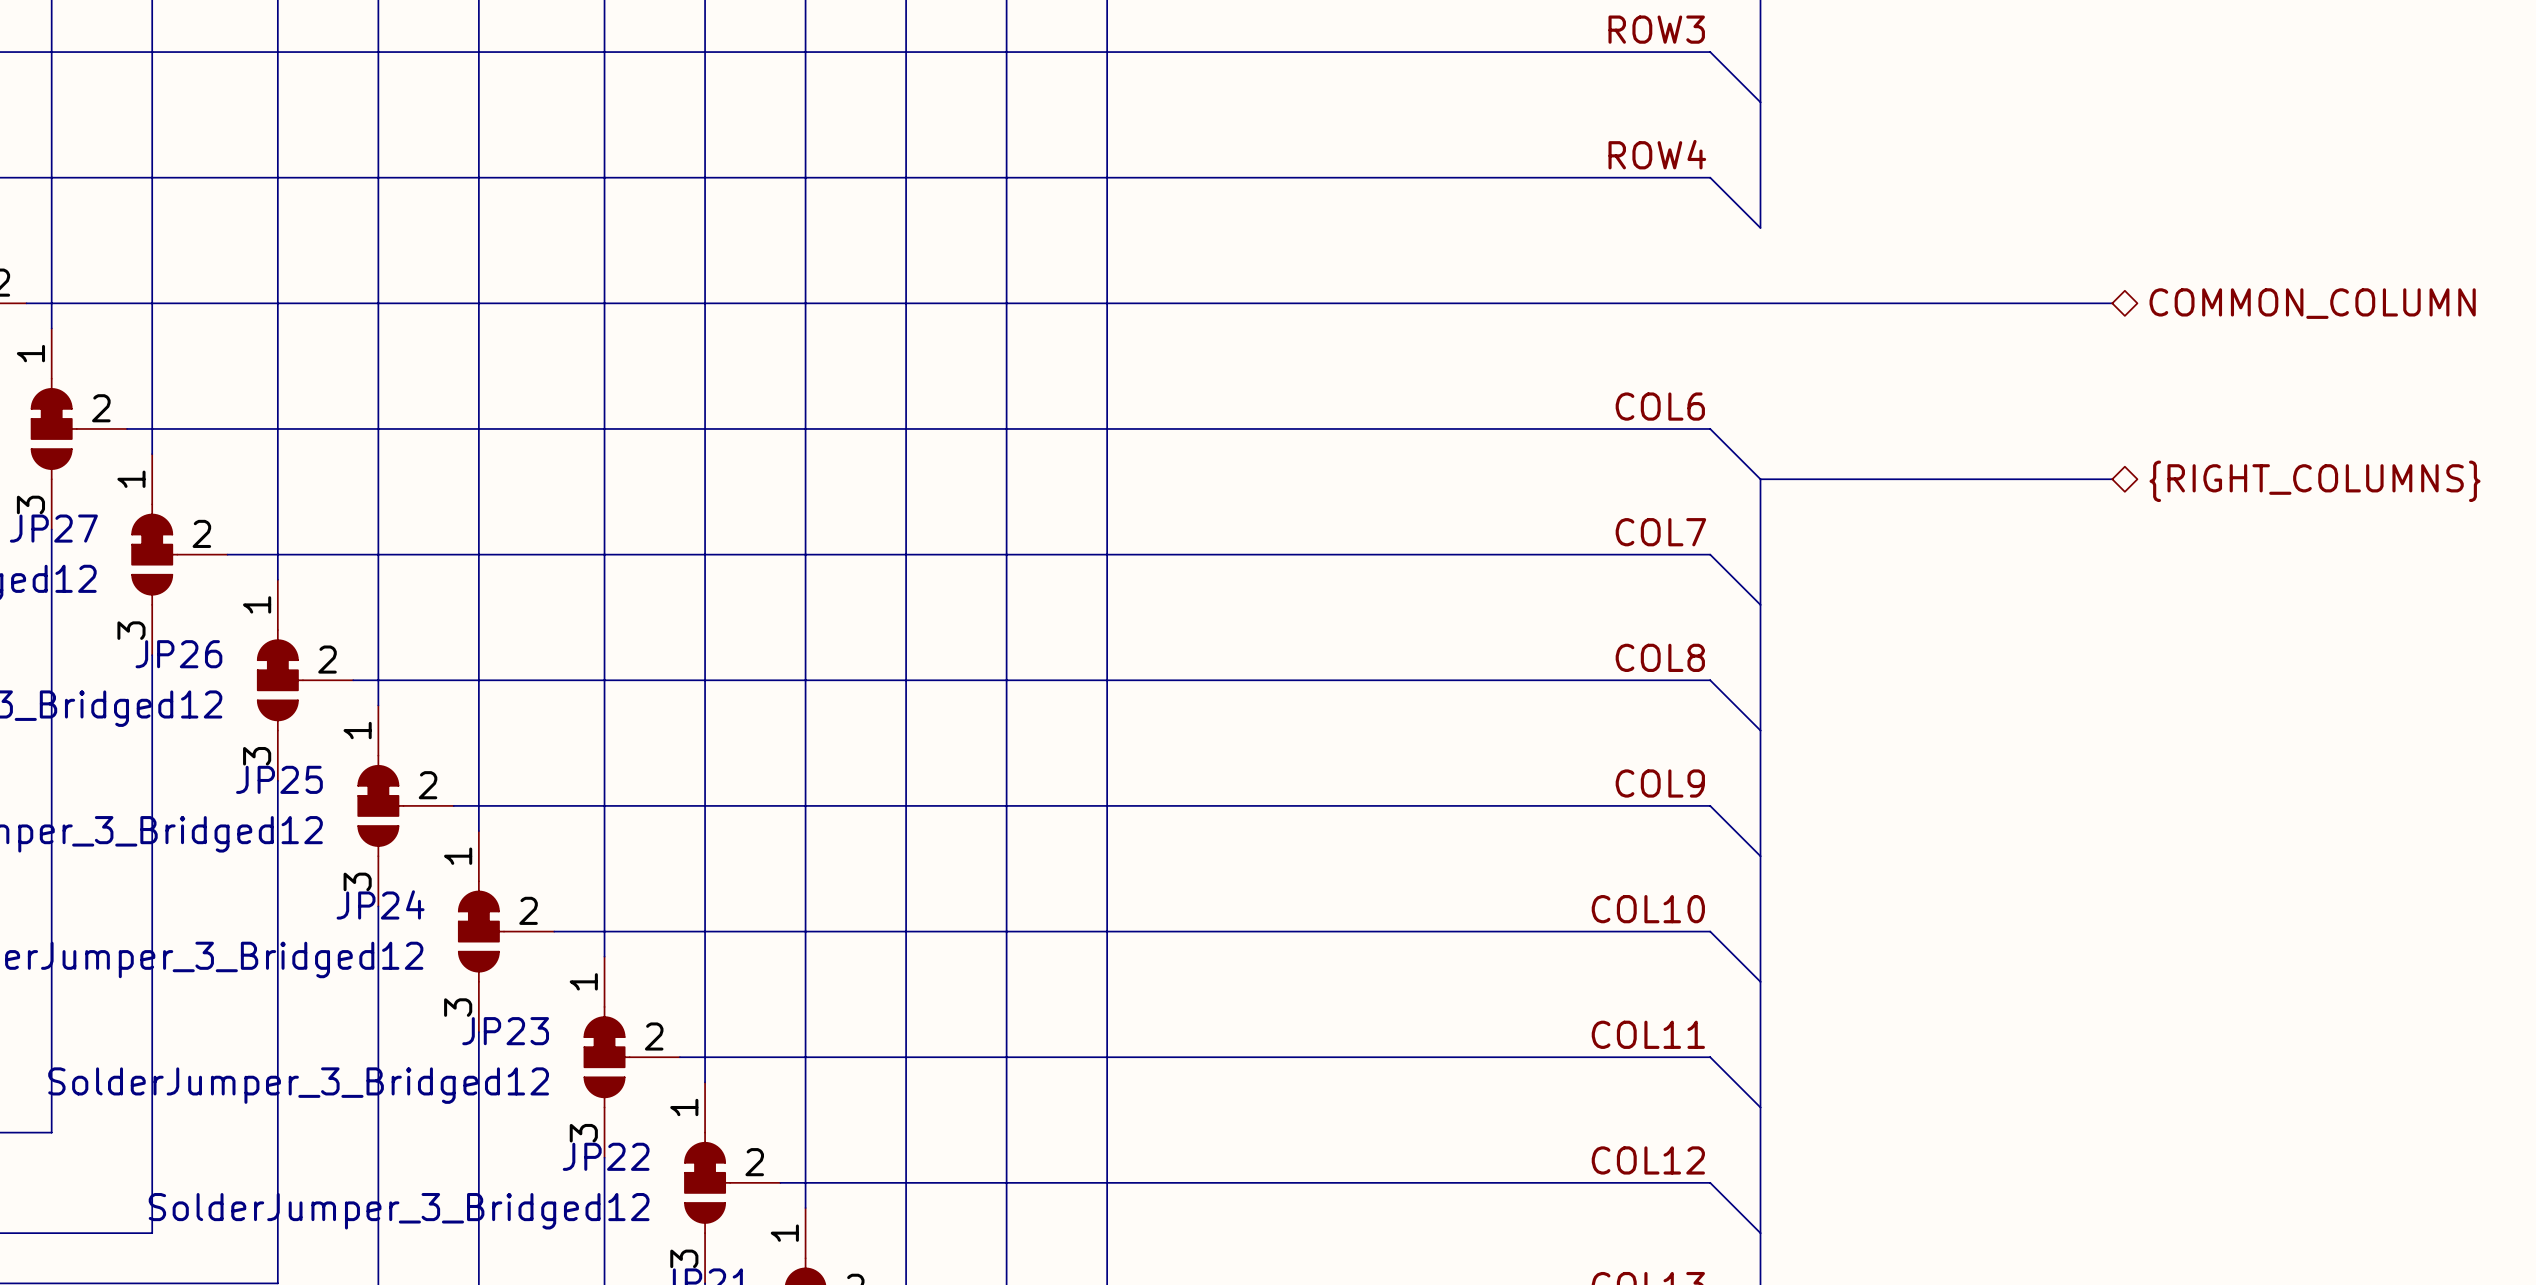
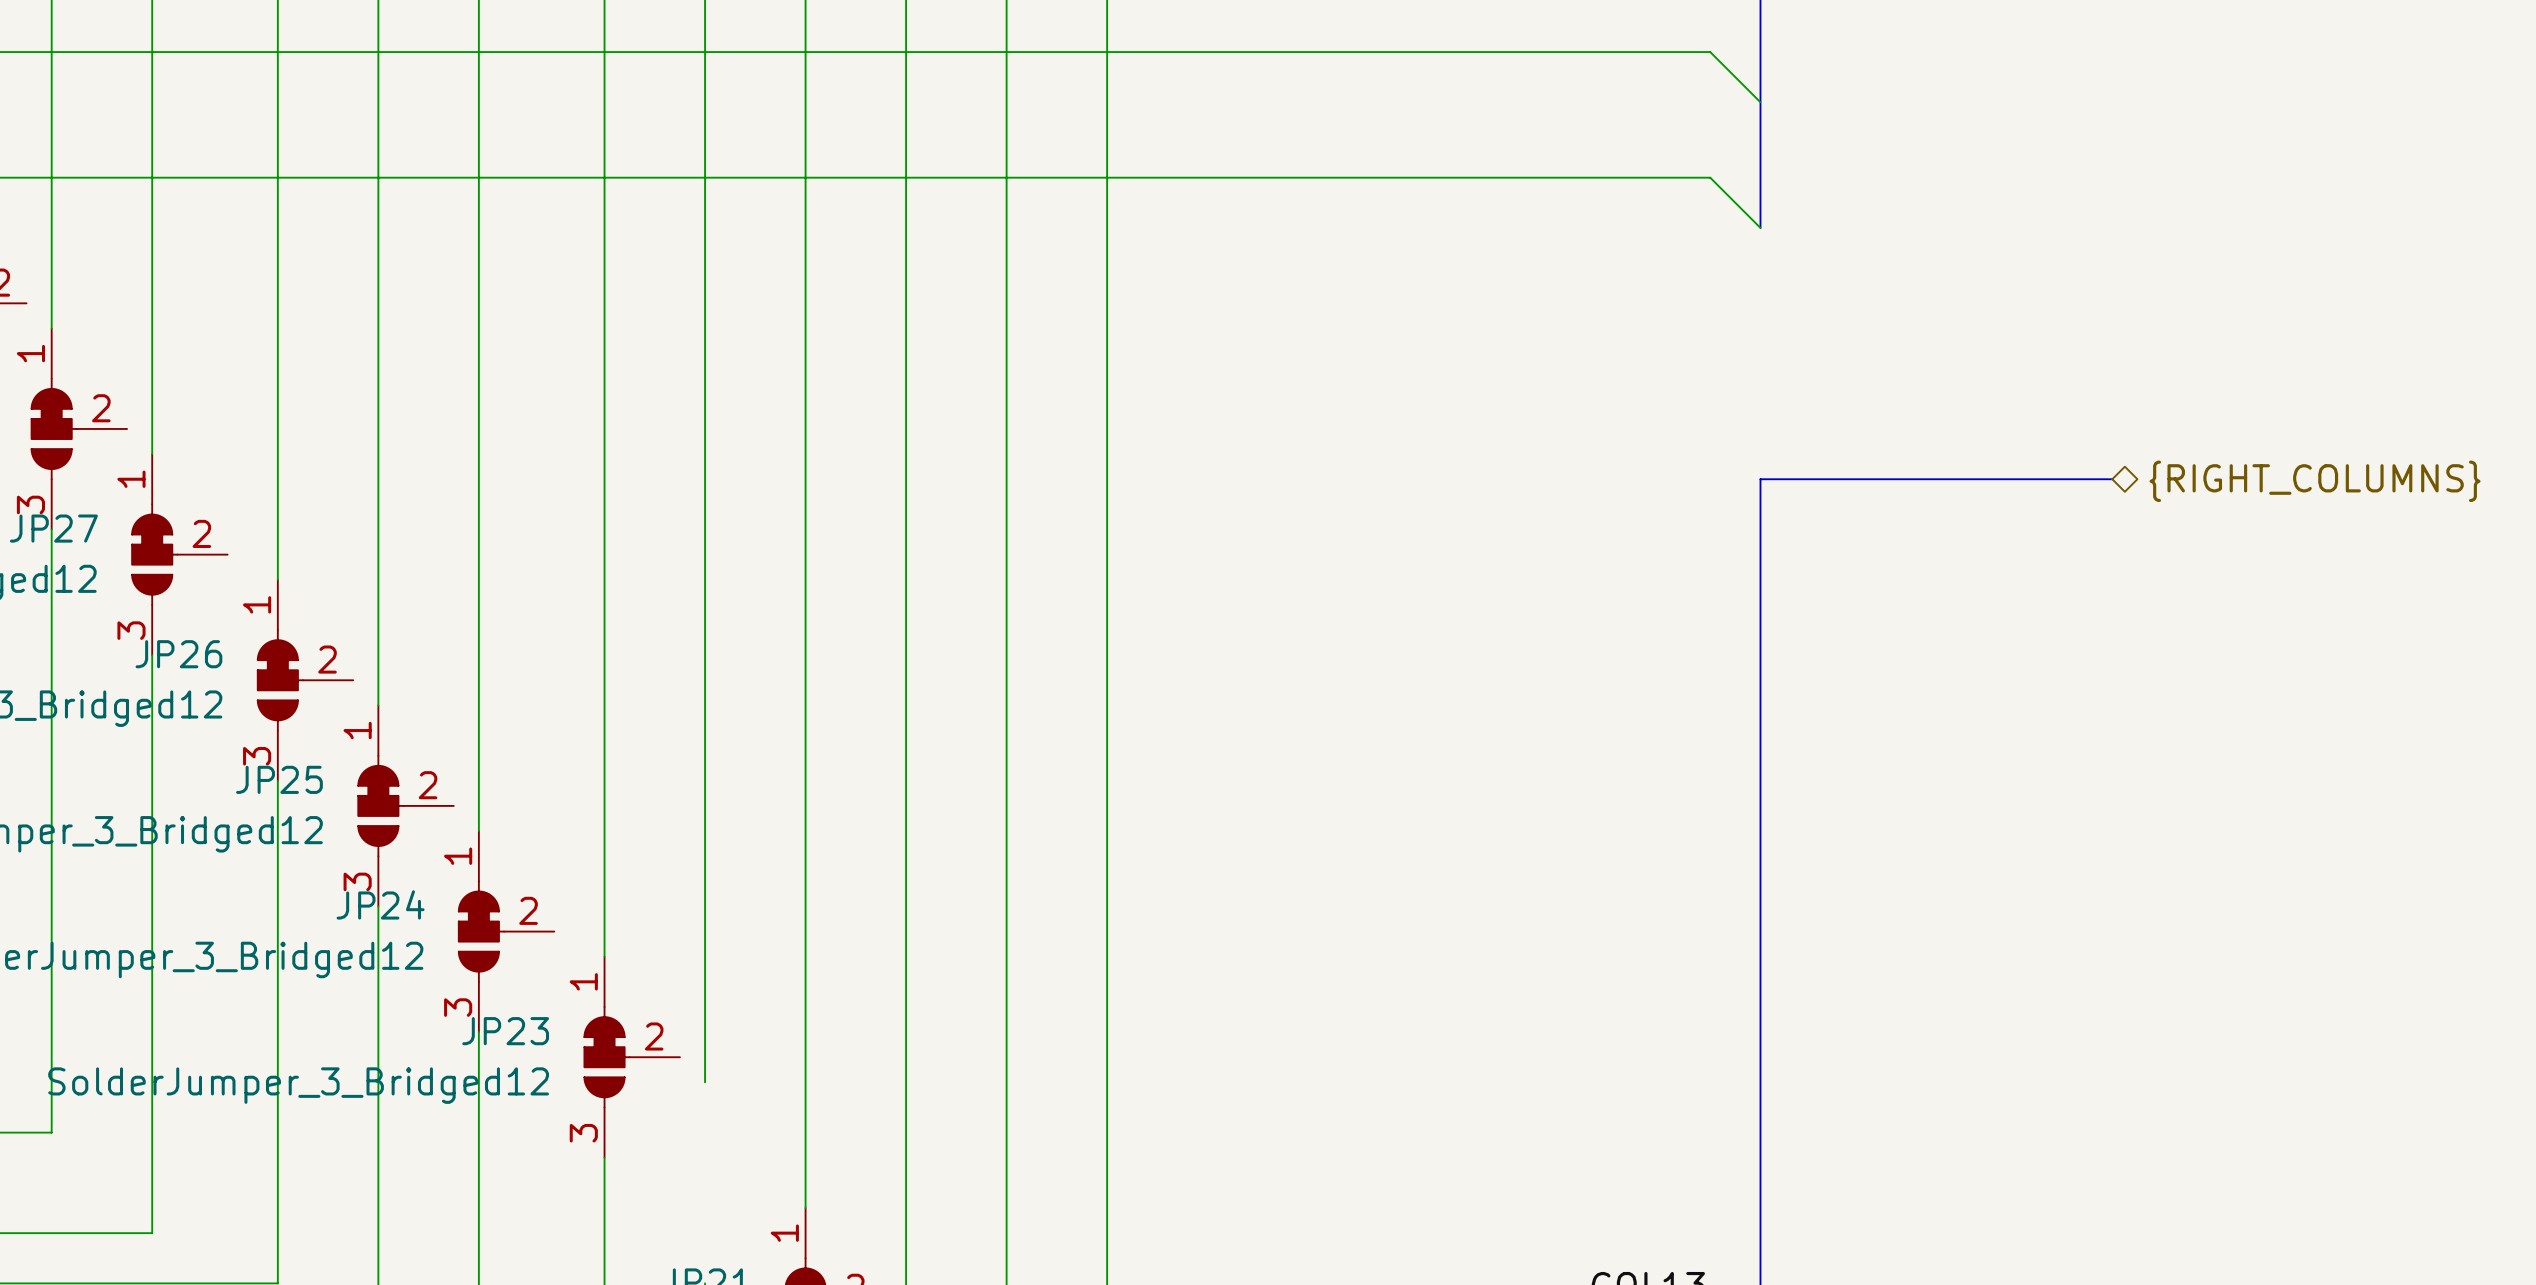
label: ROW3 (1656, 29) -> none
label: ROW4 (1657, 154) -> none
wire: (26, 303) (2112, 303) -> none
hierarchical label: COMMON_COLUMN (2312, 303) -> none
label: COL6 (1660, 406) -> none
wire: (127, 428) (1710, 428) (1760, 479) -> none
label: COL7 (1660, 532) -> none
wire: (227, 554) (1710, 554) (1760, 604) -> none
label: COL8 (1660, 657) -> none
wire: (353, 680) (1710, 680) (1760, 730) -> none
label: COL9 (1660, 783) -> none
wire: (453, 805) (1710, 805) (1760, 856) -> none
label: COL10 (1648, 909) -> none
wire: (554, 931) (1710, 931) (1760, 981) -> none
label: COL11 (1648, 1034) -> none
wire: (679, 1057) (1710, 1057) (1760, 1107) -> none
label: COL12 (1648, 1160) -> none
JP22: SolderJumper_3_Bridged12 (732, 1182) -> none
wire: (780, 1182) (1710, 1182) (1760, 1233) -> none

